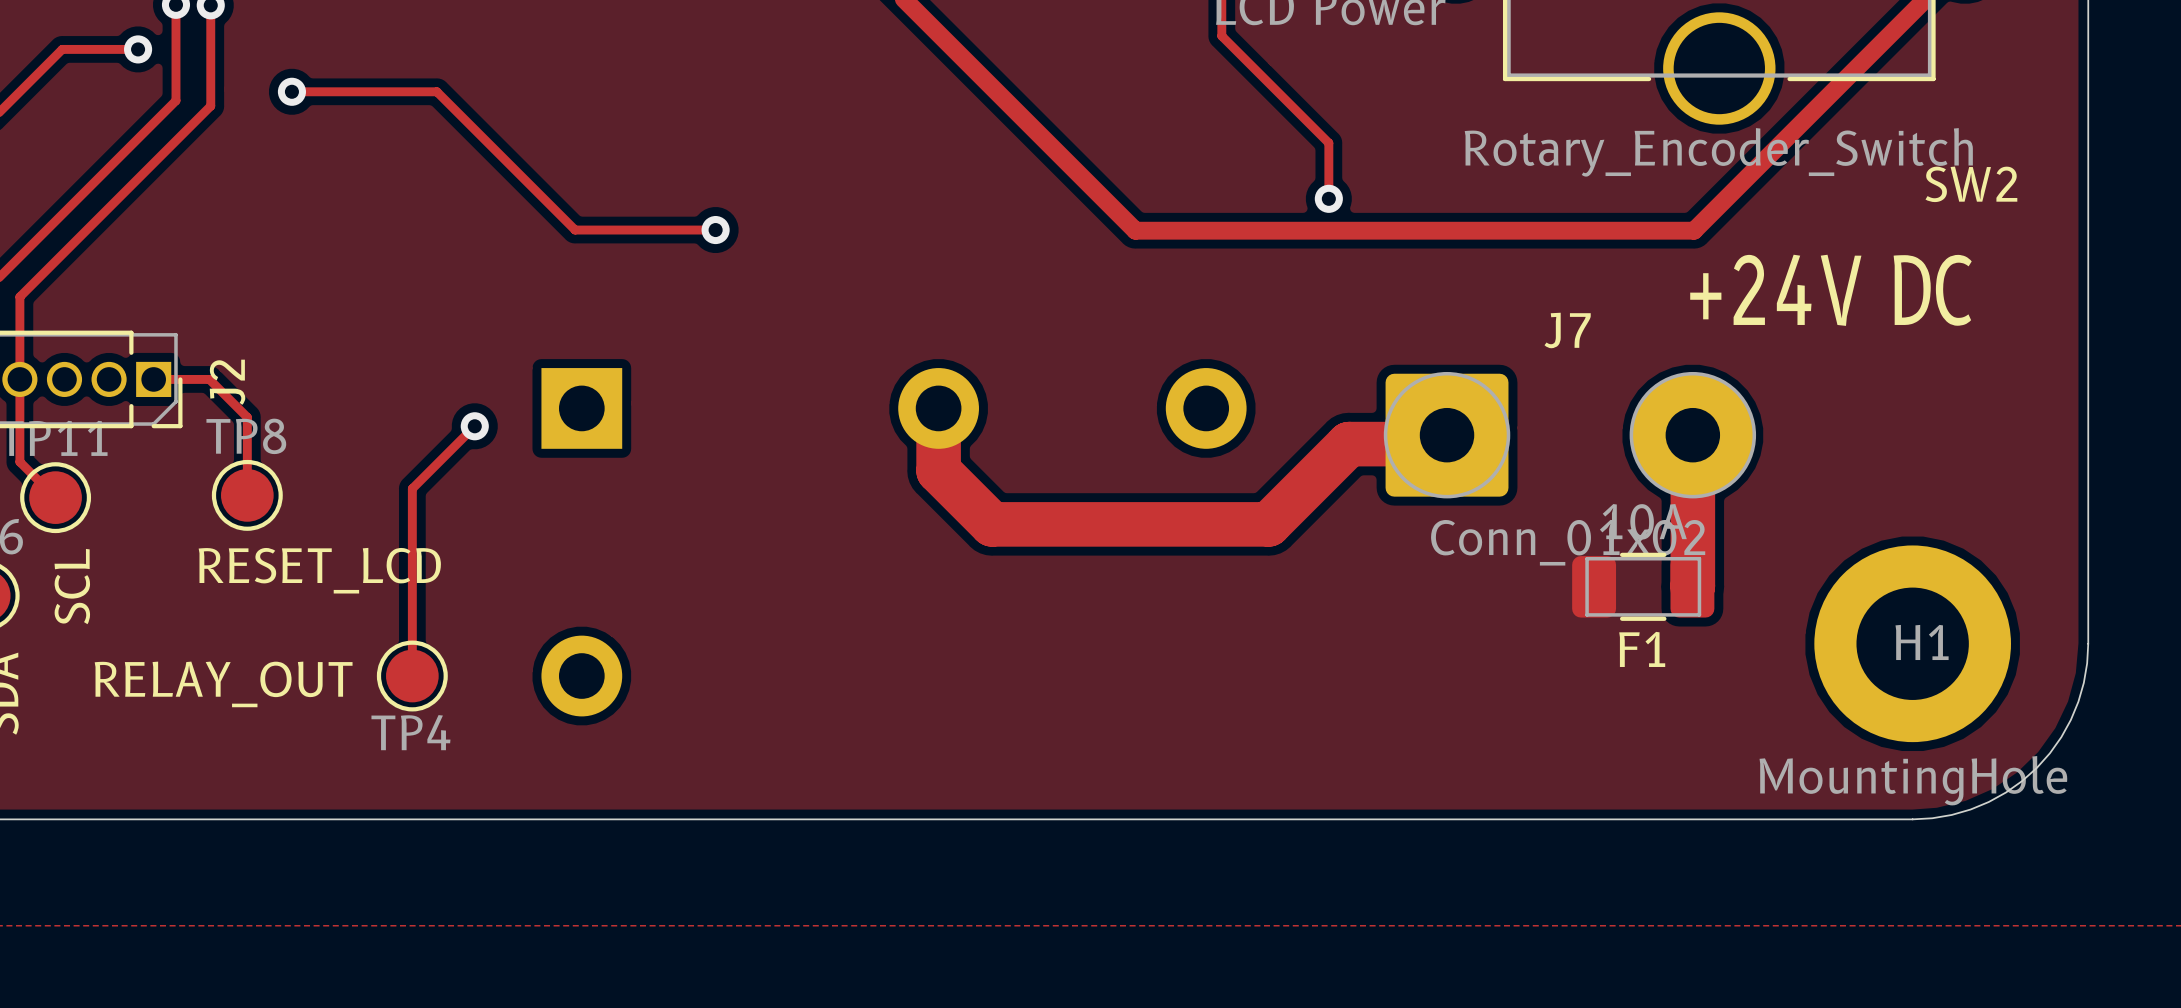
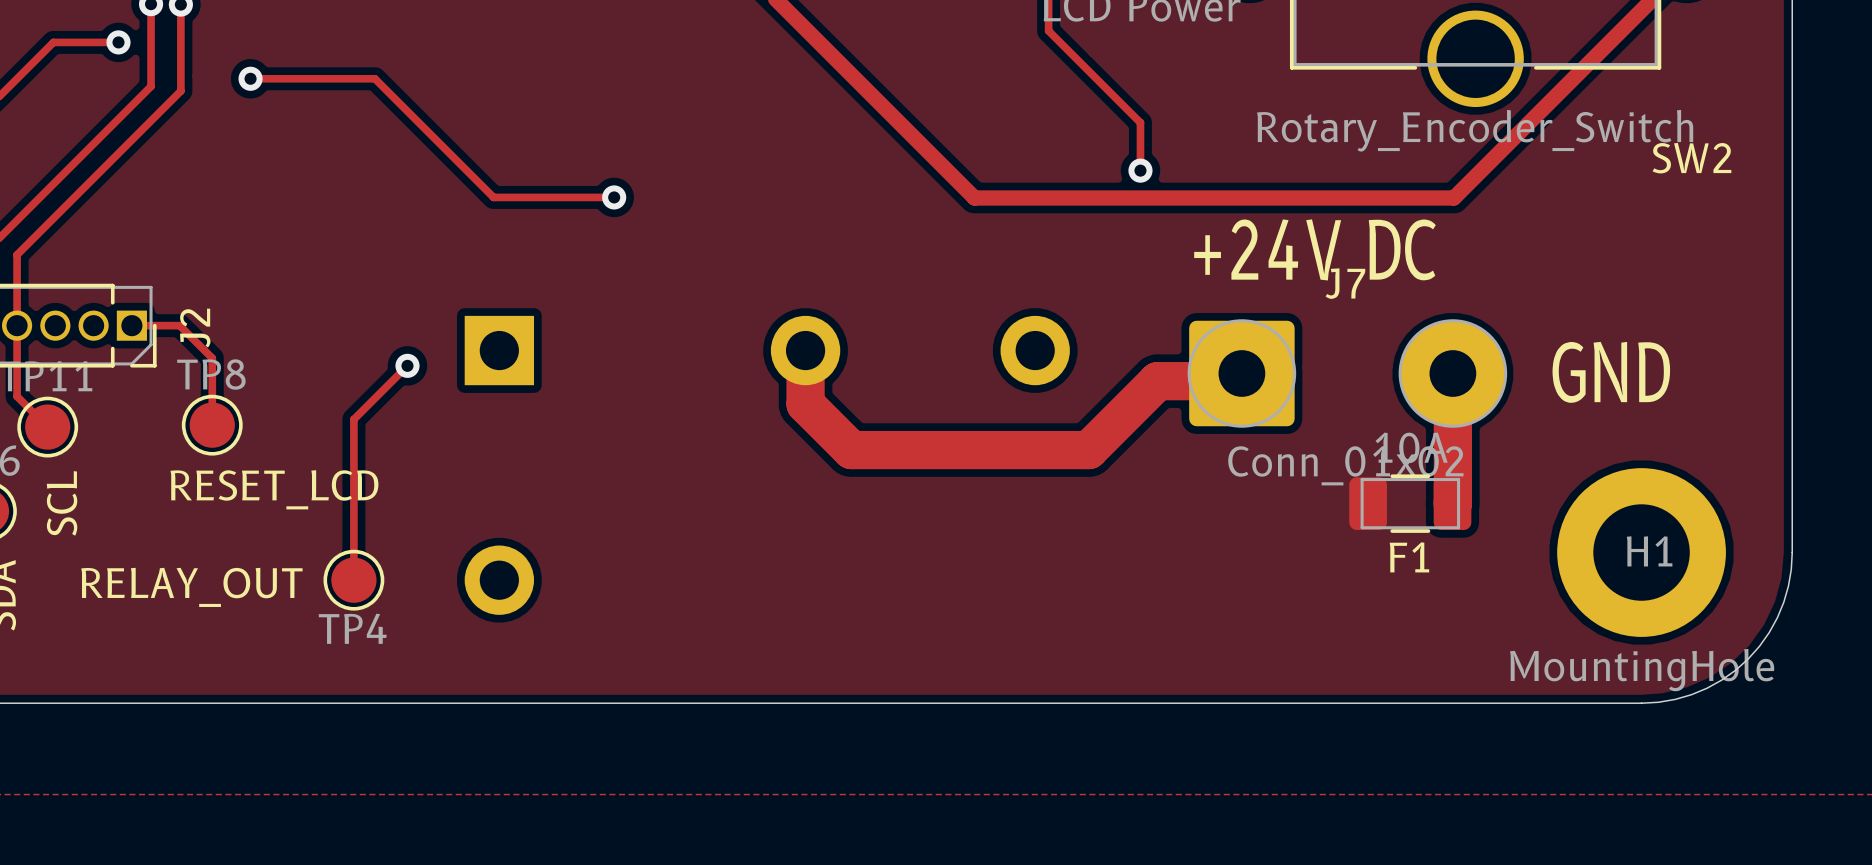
text position: +24V DC (1830, 290) -> +24V DC (1314, 249)
text: none -> GND (1611, 372)

